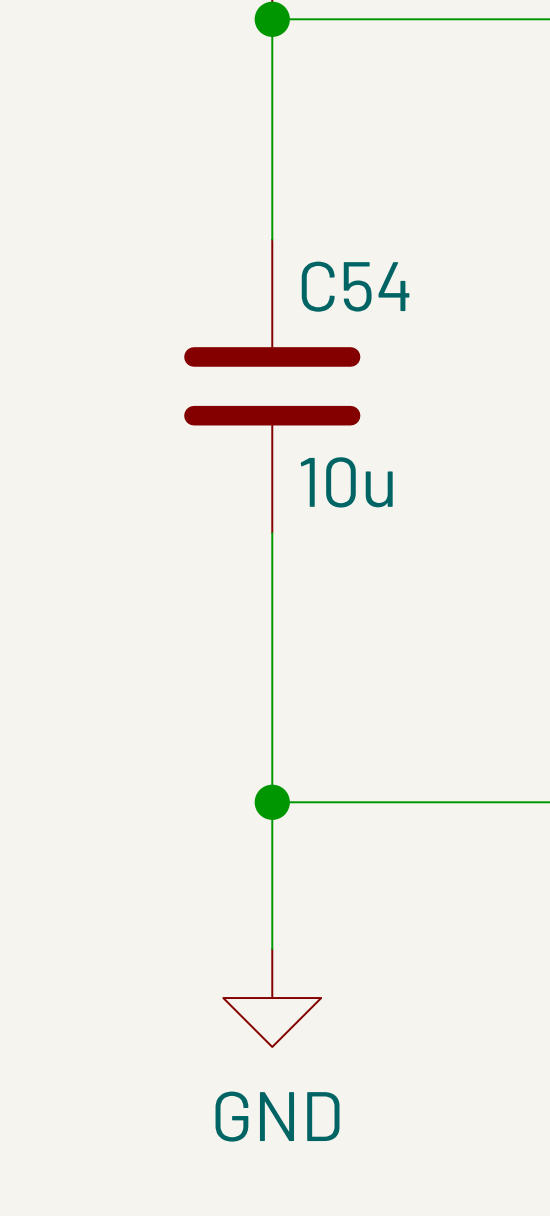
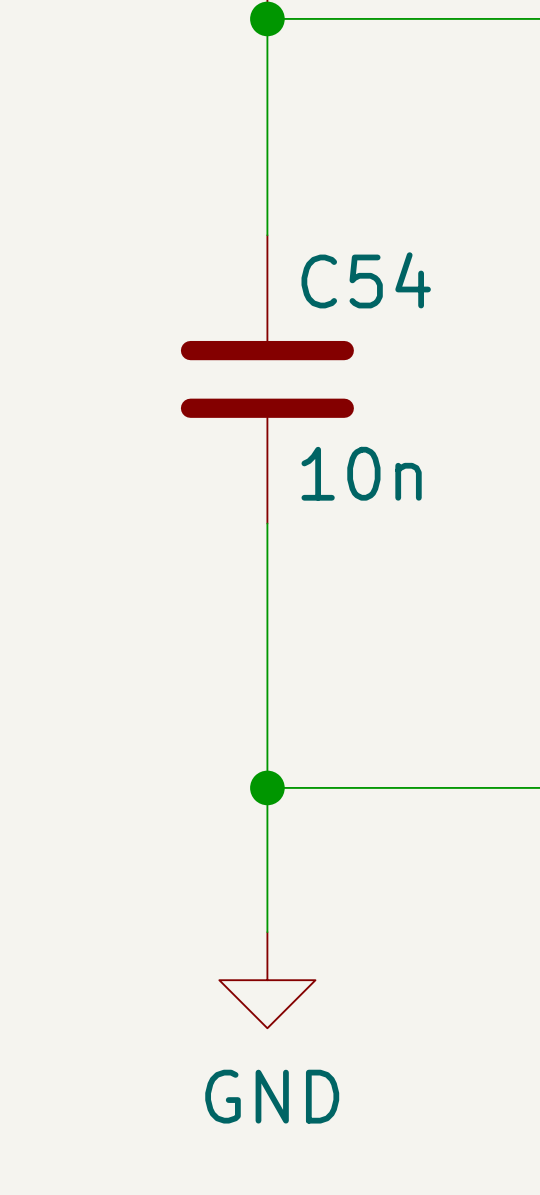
C54 value: 10u (346, 482) -> 10n (361, 473)

